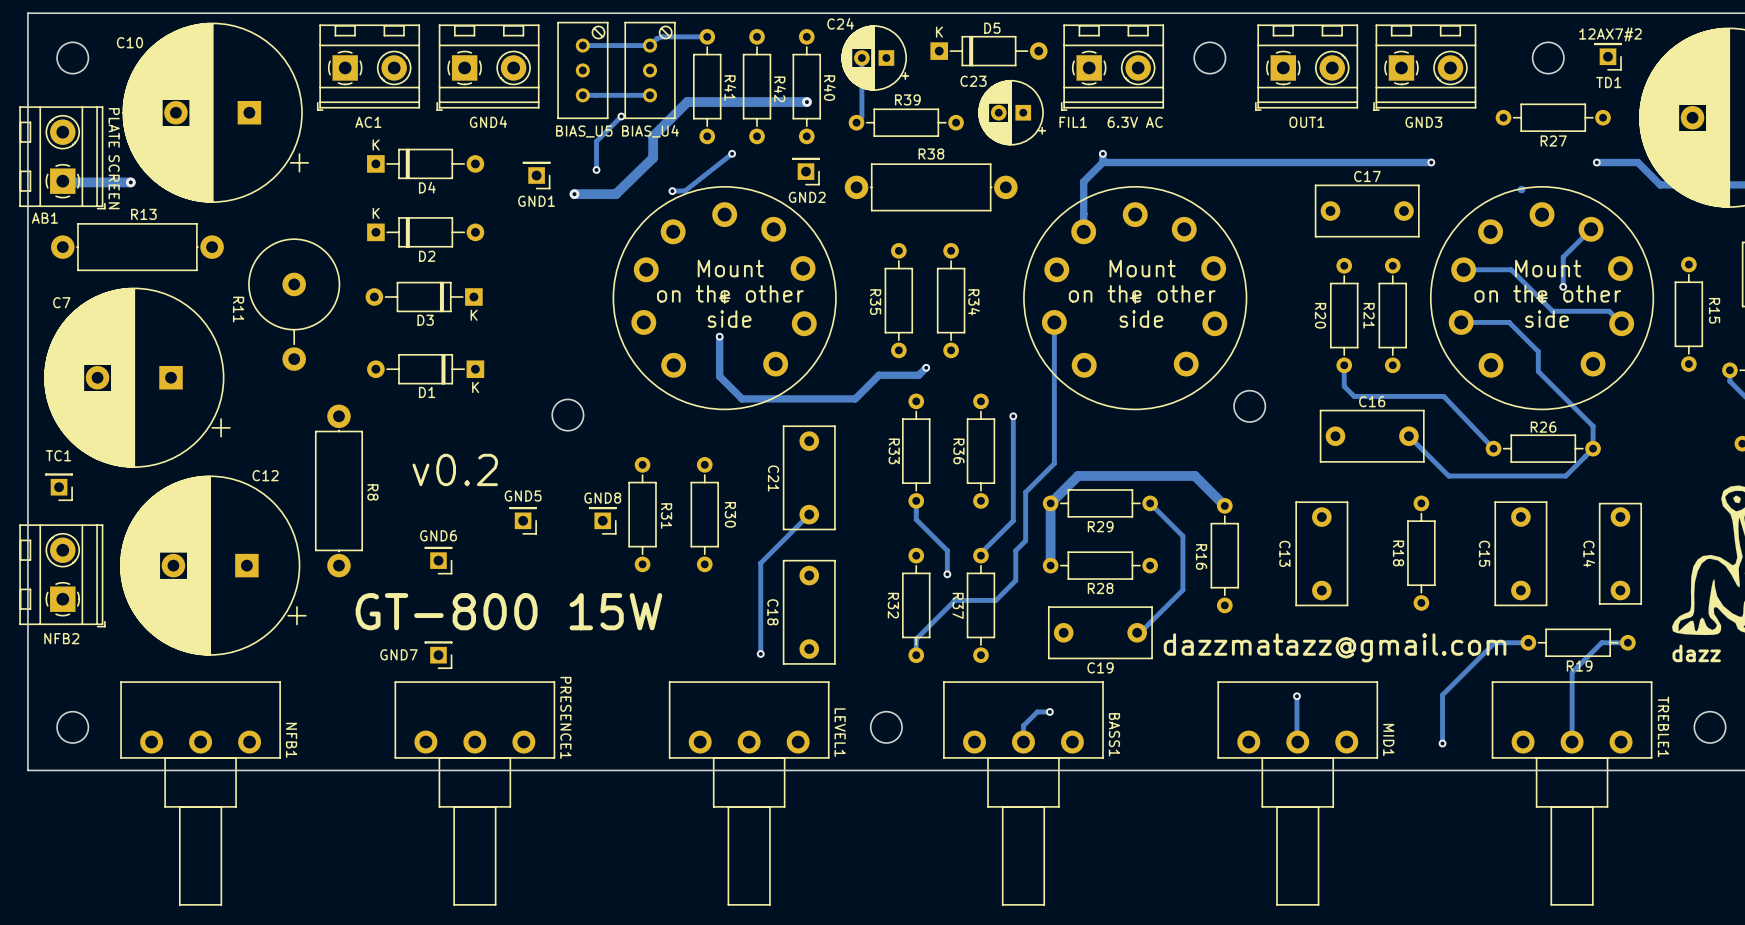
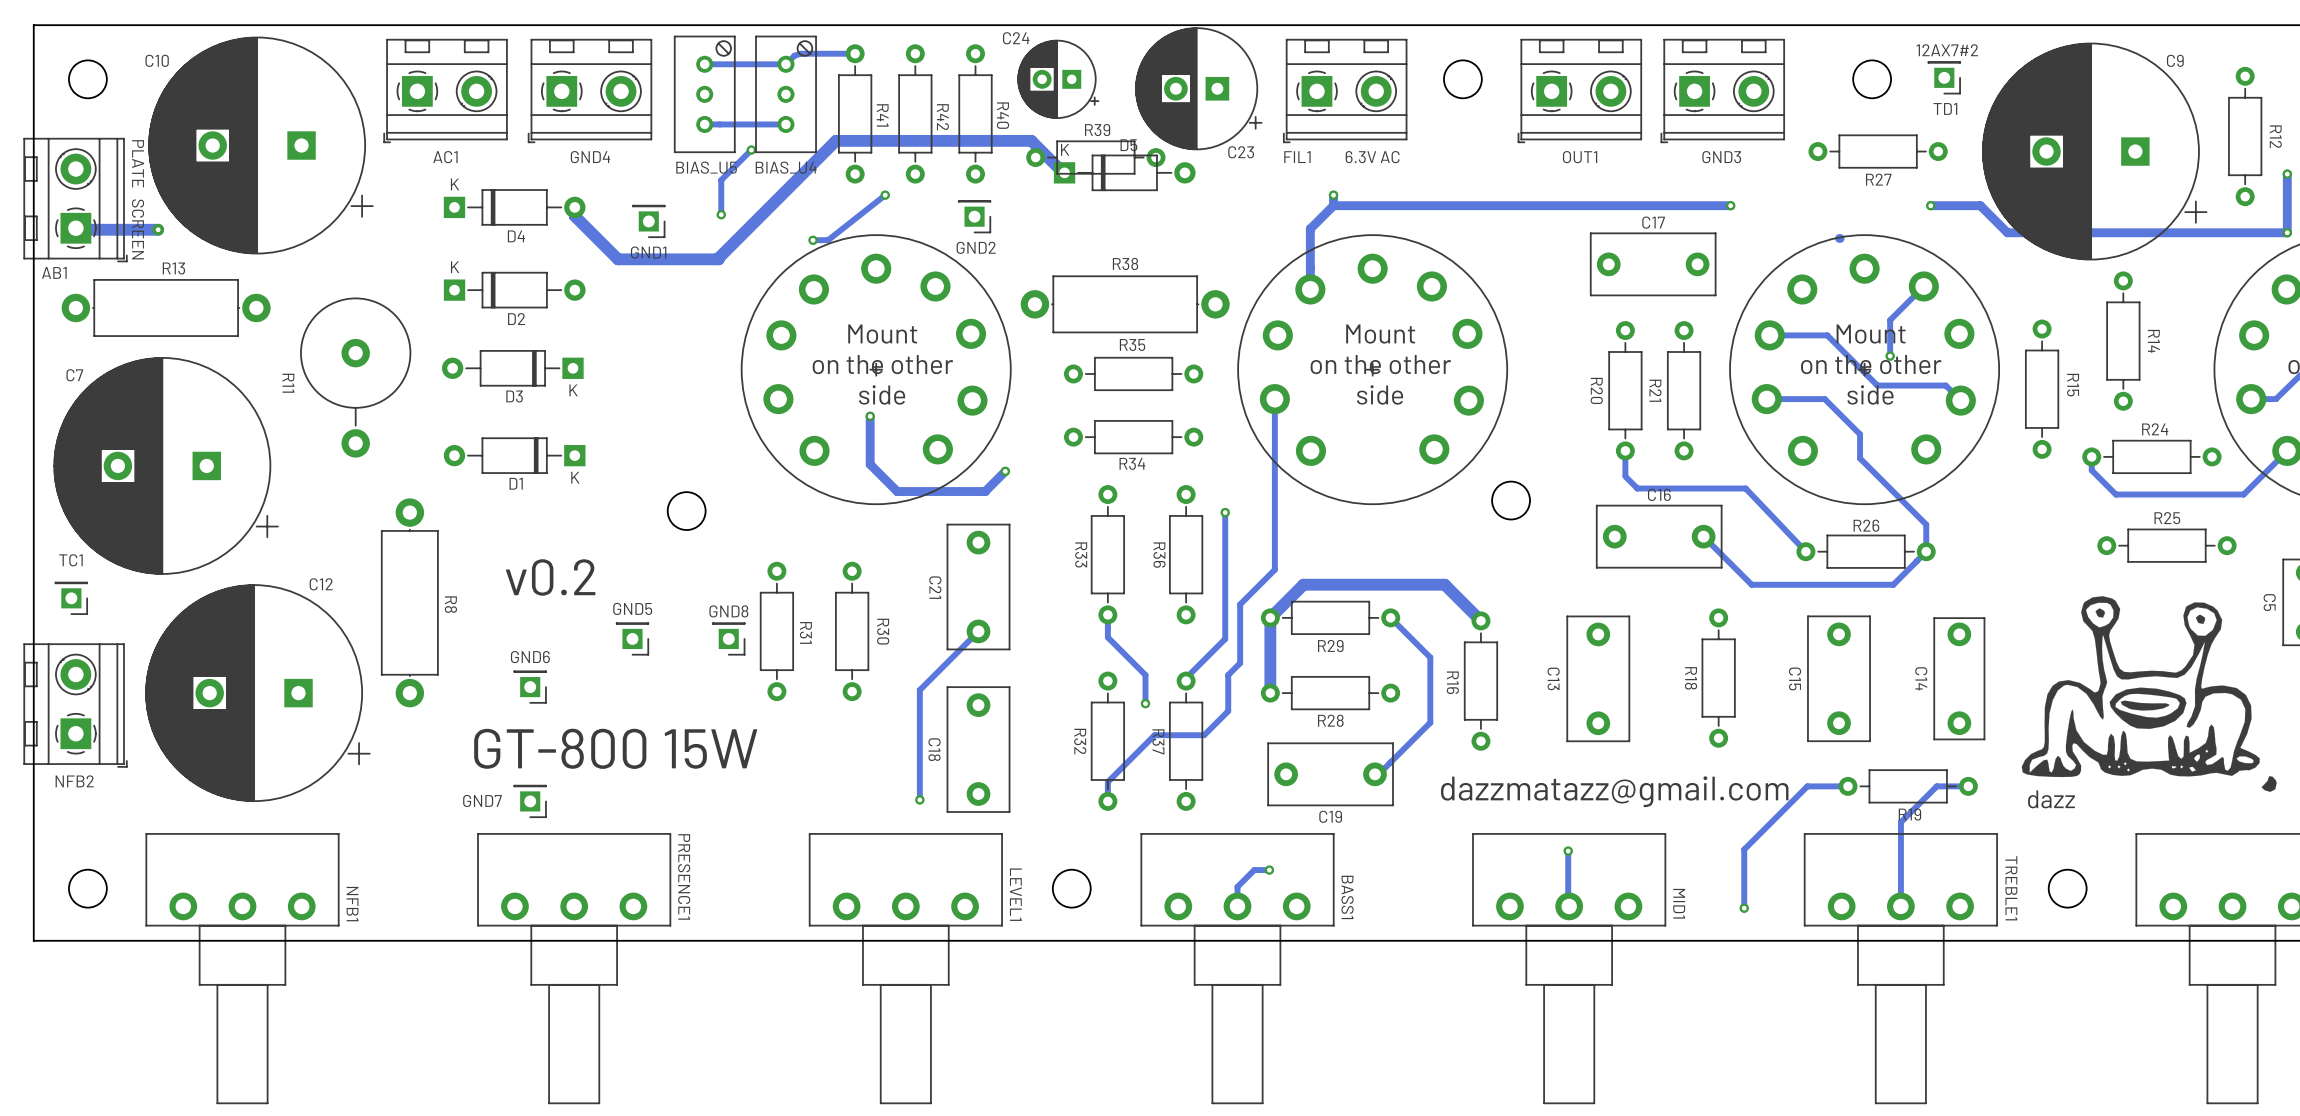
D5 position: (988, 51) -> (1124, 172)
track: (861, 58) (861, 117) -> none
C23 footprint: [978, 80, 1046, 146] -> [1135, 27, 1263, 151]
C23 name position: C23 (973, 81) -> C23 (1241, 152)
track: (806, 102) (687, 102) (653, 136) (653, 157) (615, 194) (574, 194) -> none
via: (806, 102) -> none
track: none -> (1064, 172) (1031, 140) (835, 140) (718, 259) (618, 259) (574, 216) (574, 207)
R38 position: (931, 187) -> (1125, 304)
via: (574, 194) -> none
R35 rotation: 0° (898, 300) -> 90° clockwise (1133, 373)
R34 rotation: 0° (951, 300) -> 90° clockwise (1133, 437)
track: (926, 367) (918, 375) (878, 375) (855, 398) (814, 398) -> (1005, 471) (985, 491)
via: (926, 367) -> none
via: none -> (1005, 471)

